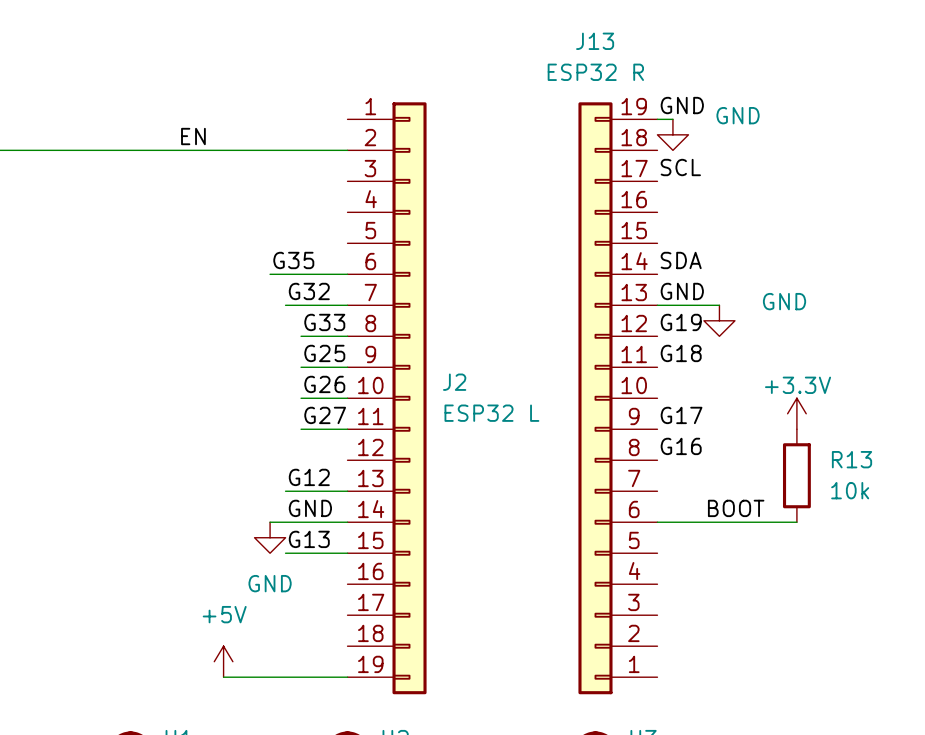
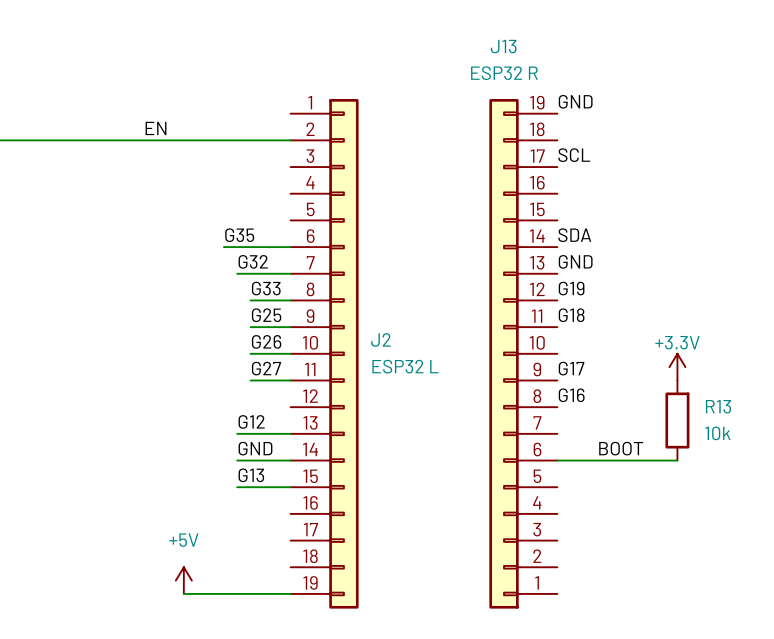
wire: (657, 119) (672, 119) -> none
power symbol: GND (672, 134) -> none
wire: (657, 305) (719, 305) -> none
power symbol: GND (719, 320) -> none
wire: (270, 522) (285, 522) -> none
power symbol: GND (270, 537) -> none

